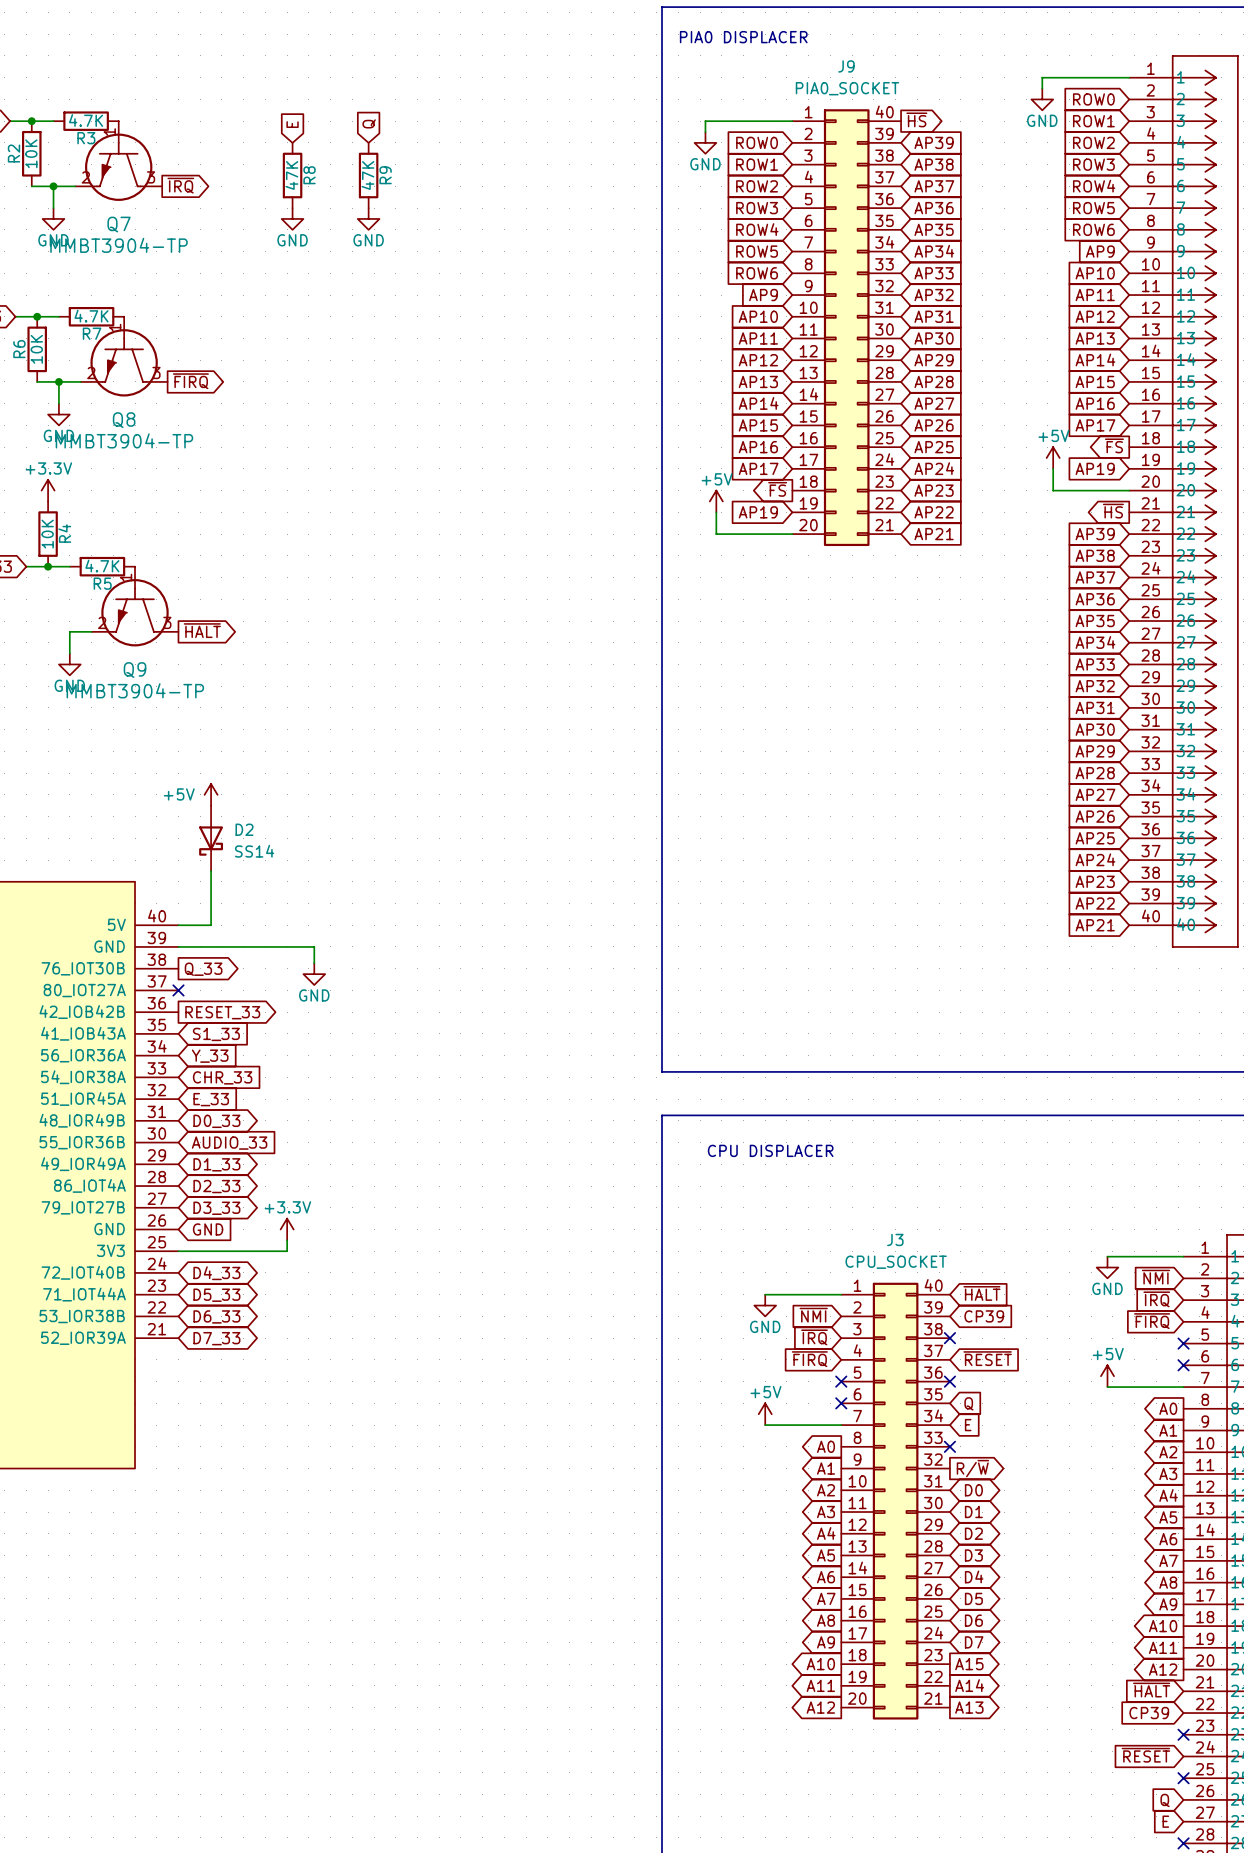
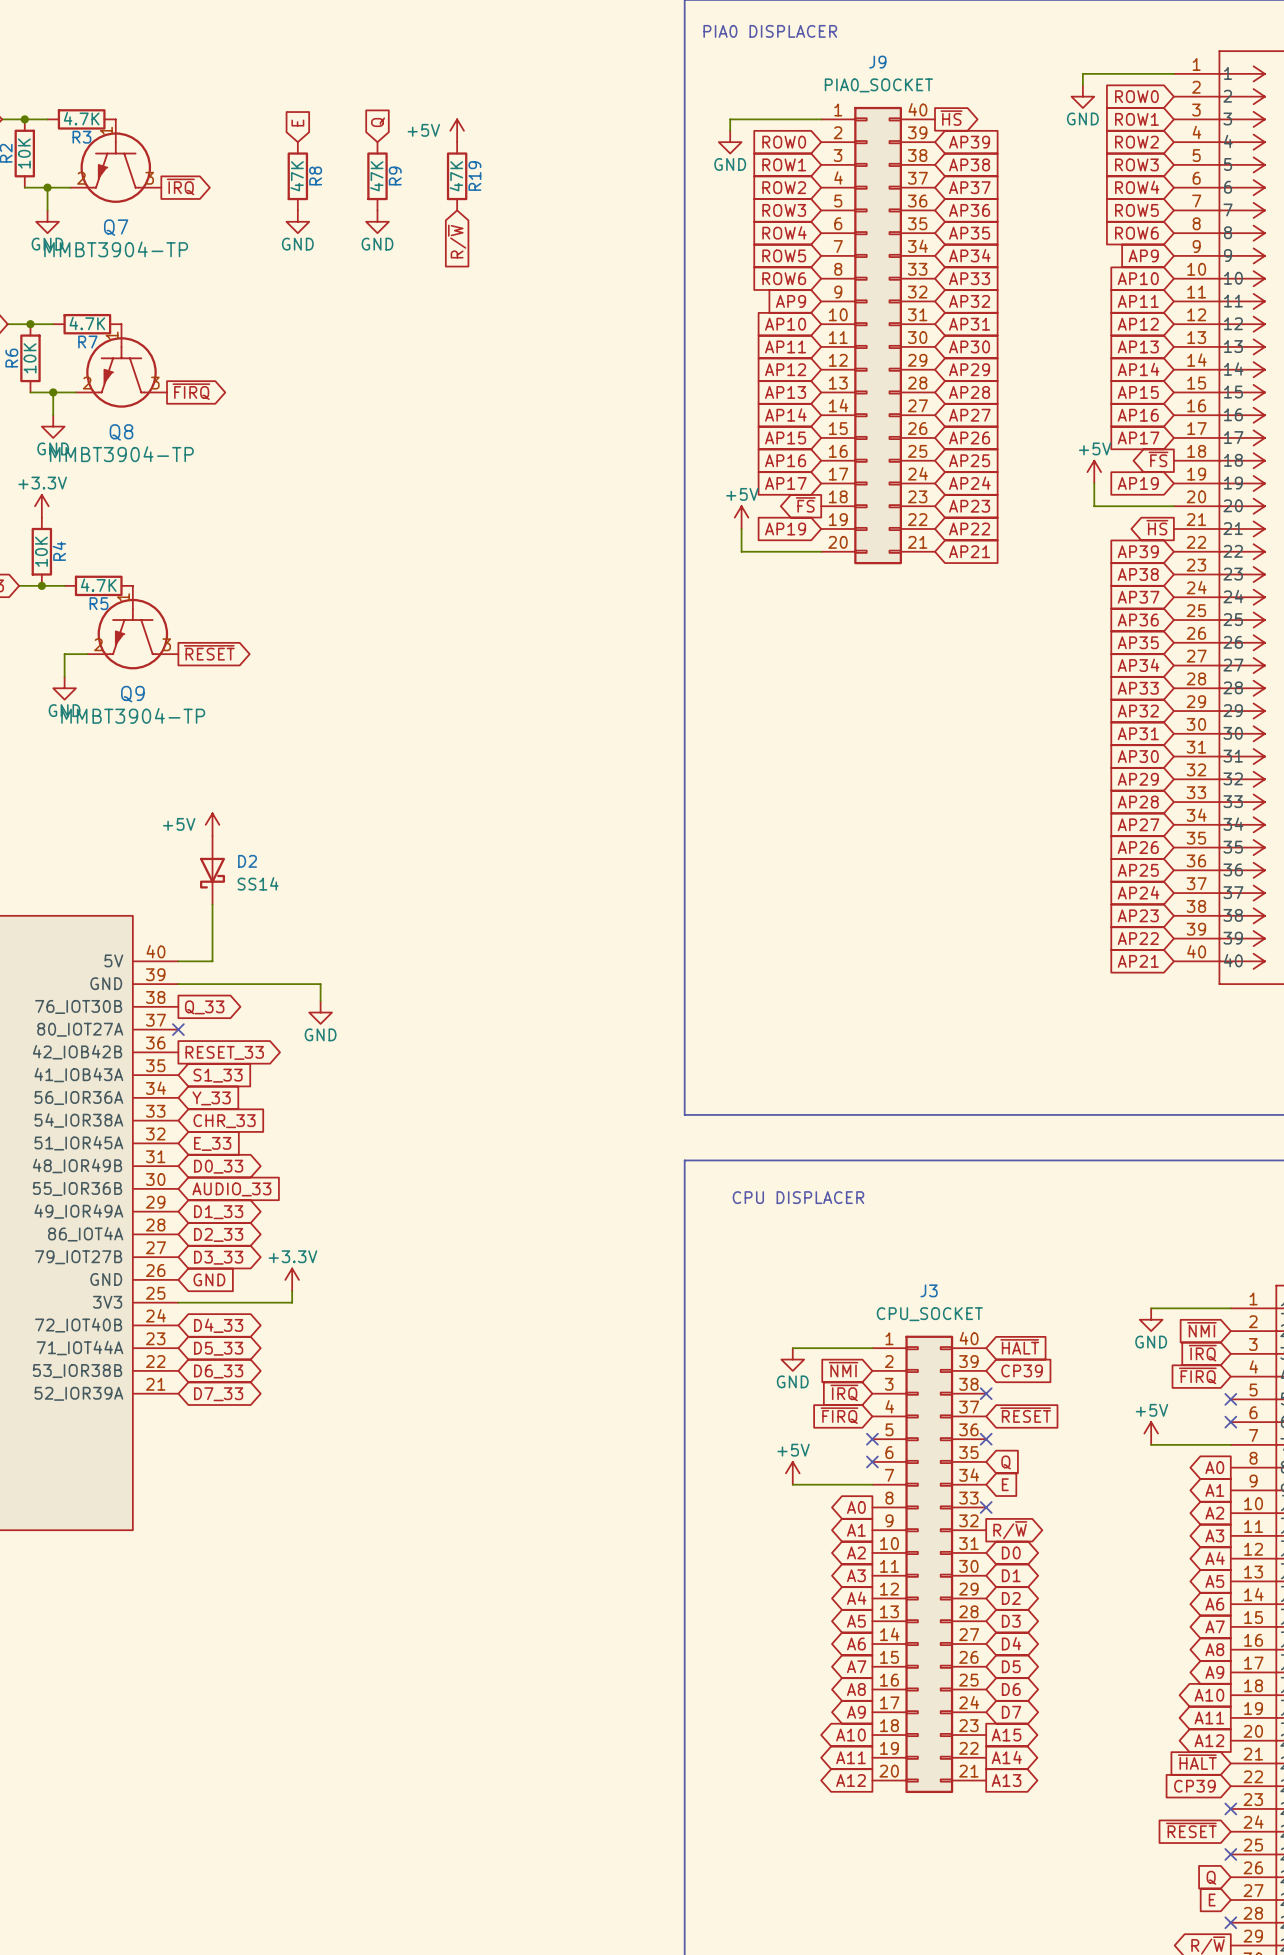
power symbol: none -> +5V (457, 130)
R19: none -> 47K (457, 176)
global label: none -> R/~{W} (457, 241)
global label: ~{HALT} (202, 630) -> ~{RESET} (209, 652)

